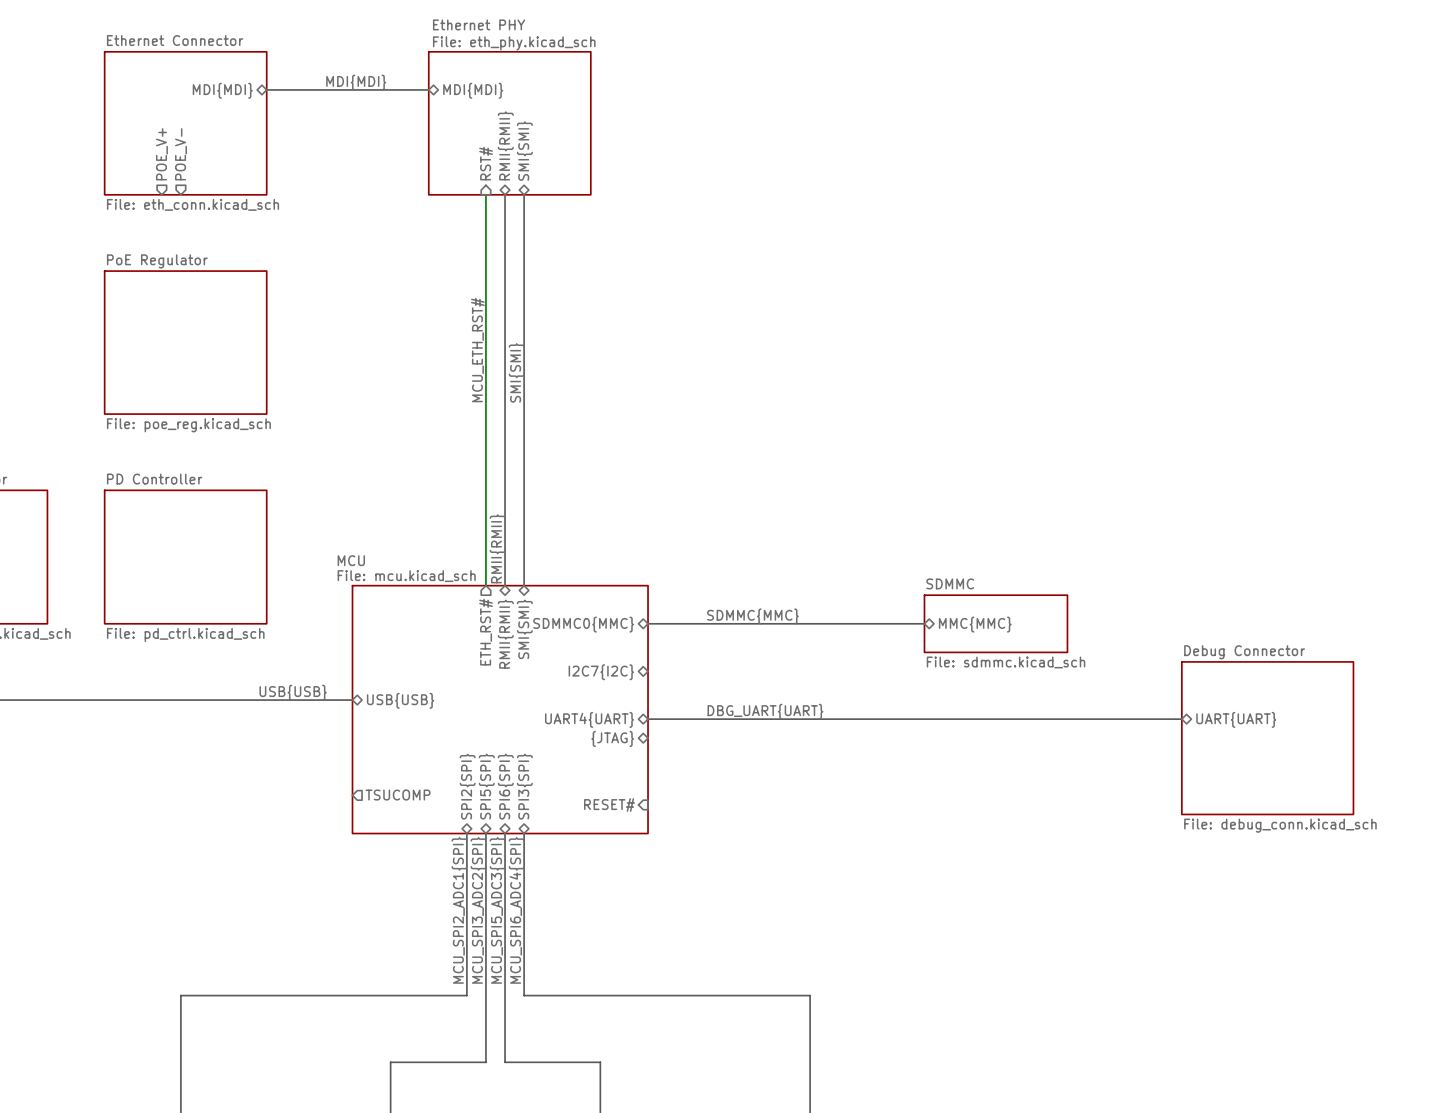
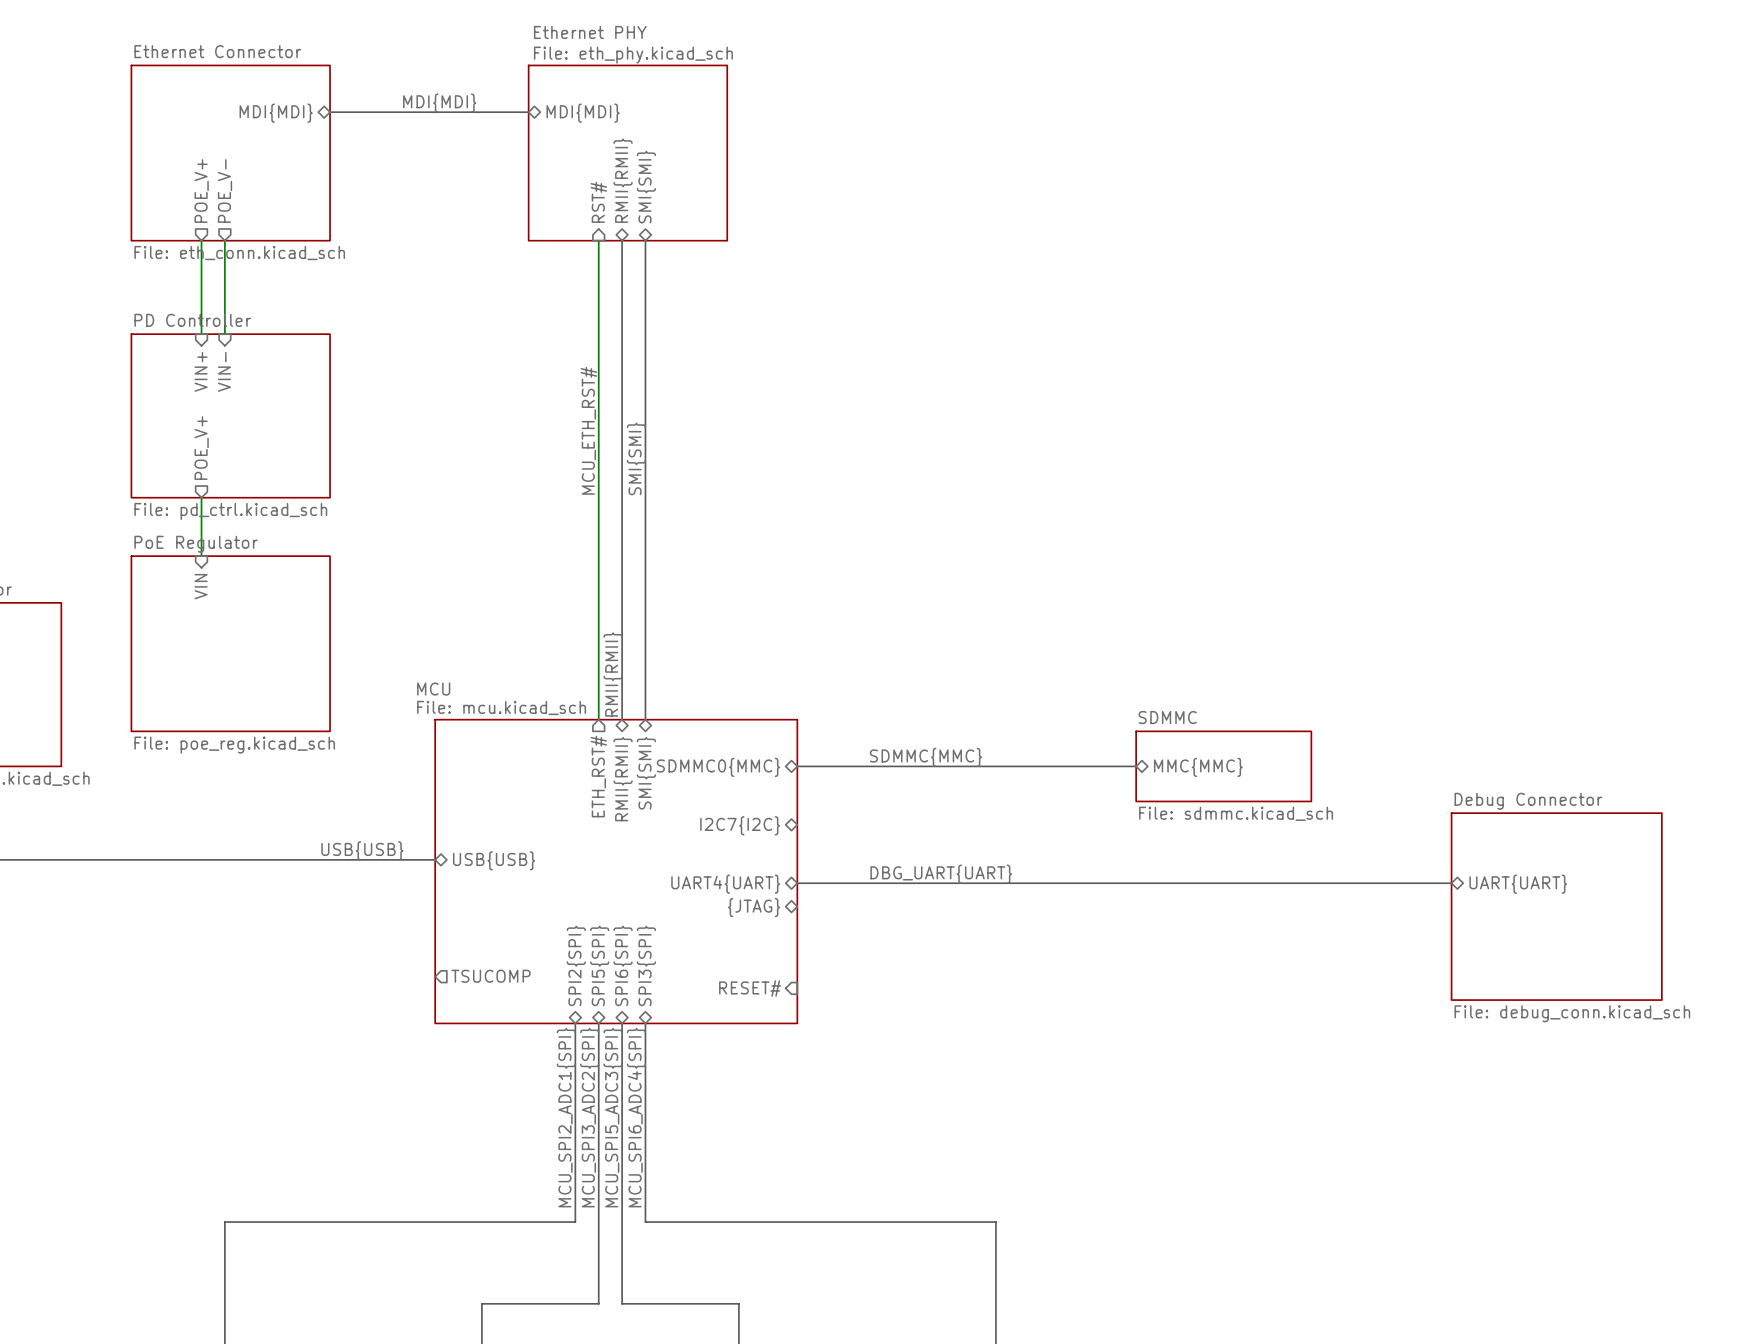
wire: none -> (201, 240) (201, 334)
wire: none -> (224, 240) (224, 334)
sheet pin: none -> VIN+ (201, 371)
sheet pin: none -> VIN- (224, 371)
sheet PD Controller: none -> File: pd_ctrl.kicad_sch (230, 415)
sheet PoE Regulator position: (185, 342) -> (230, 643)
sheet pin: none -> POE_V+ (201, 448)
wire: none -> (201, 497) (201, 556)
sheet pin: none -> VIN (201, 586)
sheet PD Controller: File: pd_ctrl.kicad_sch (185, 557) -> none

